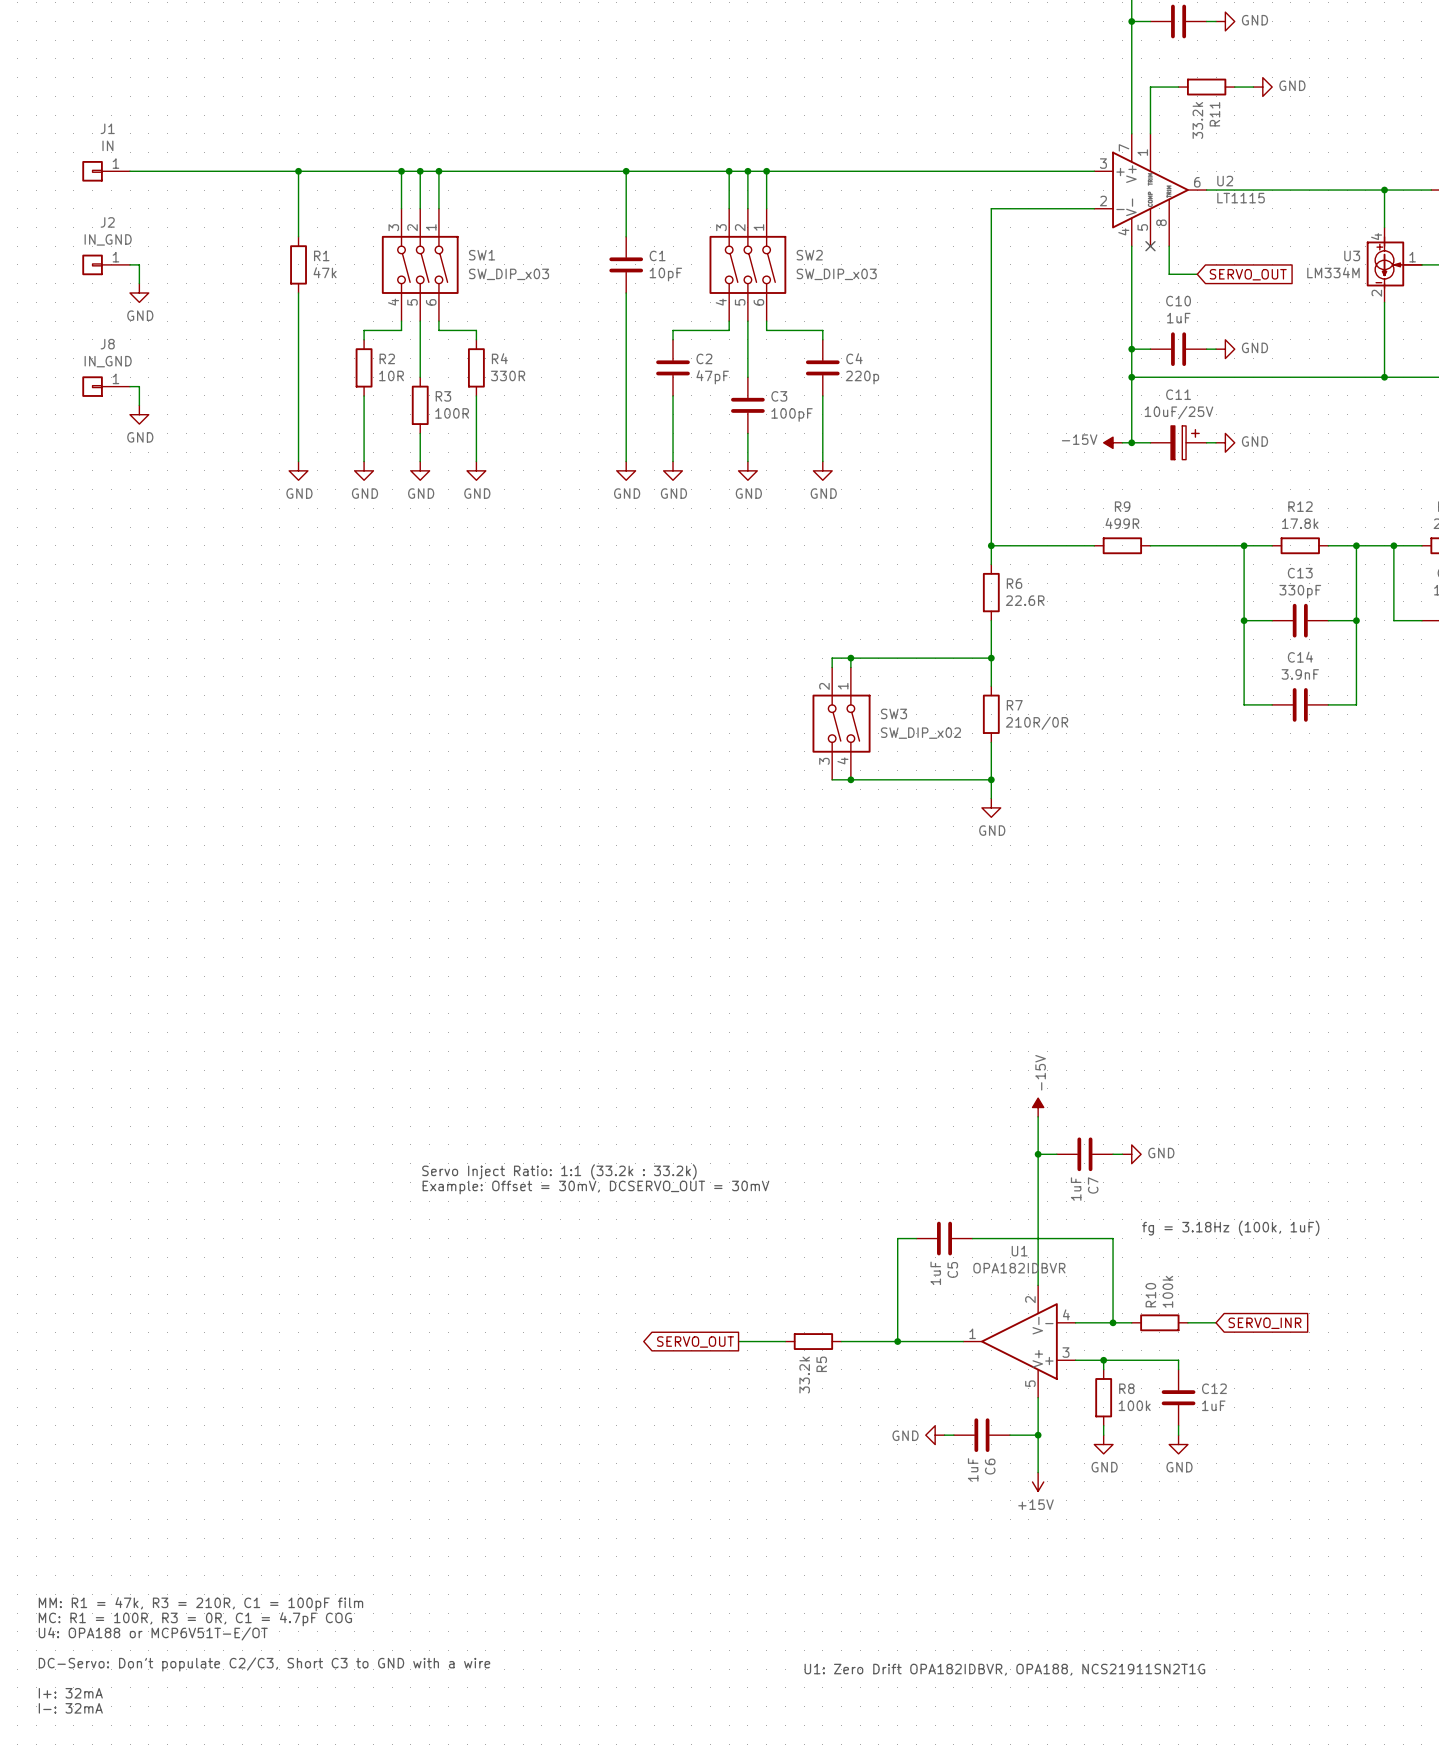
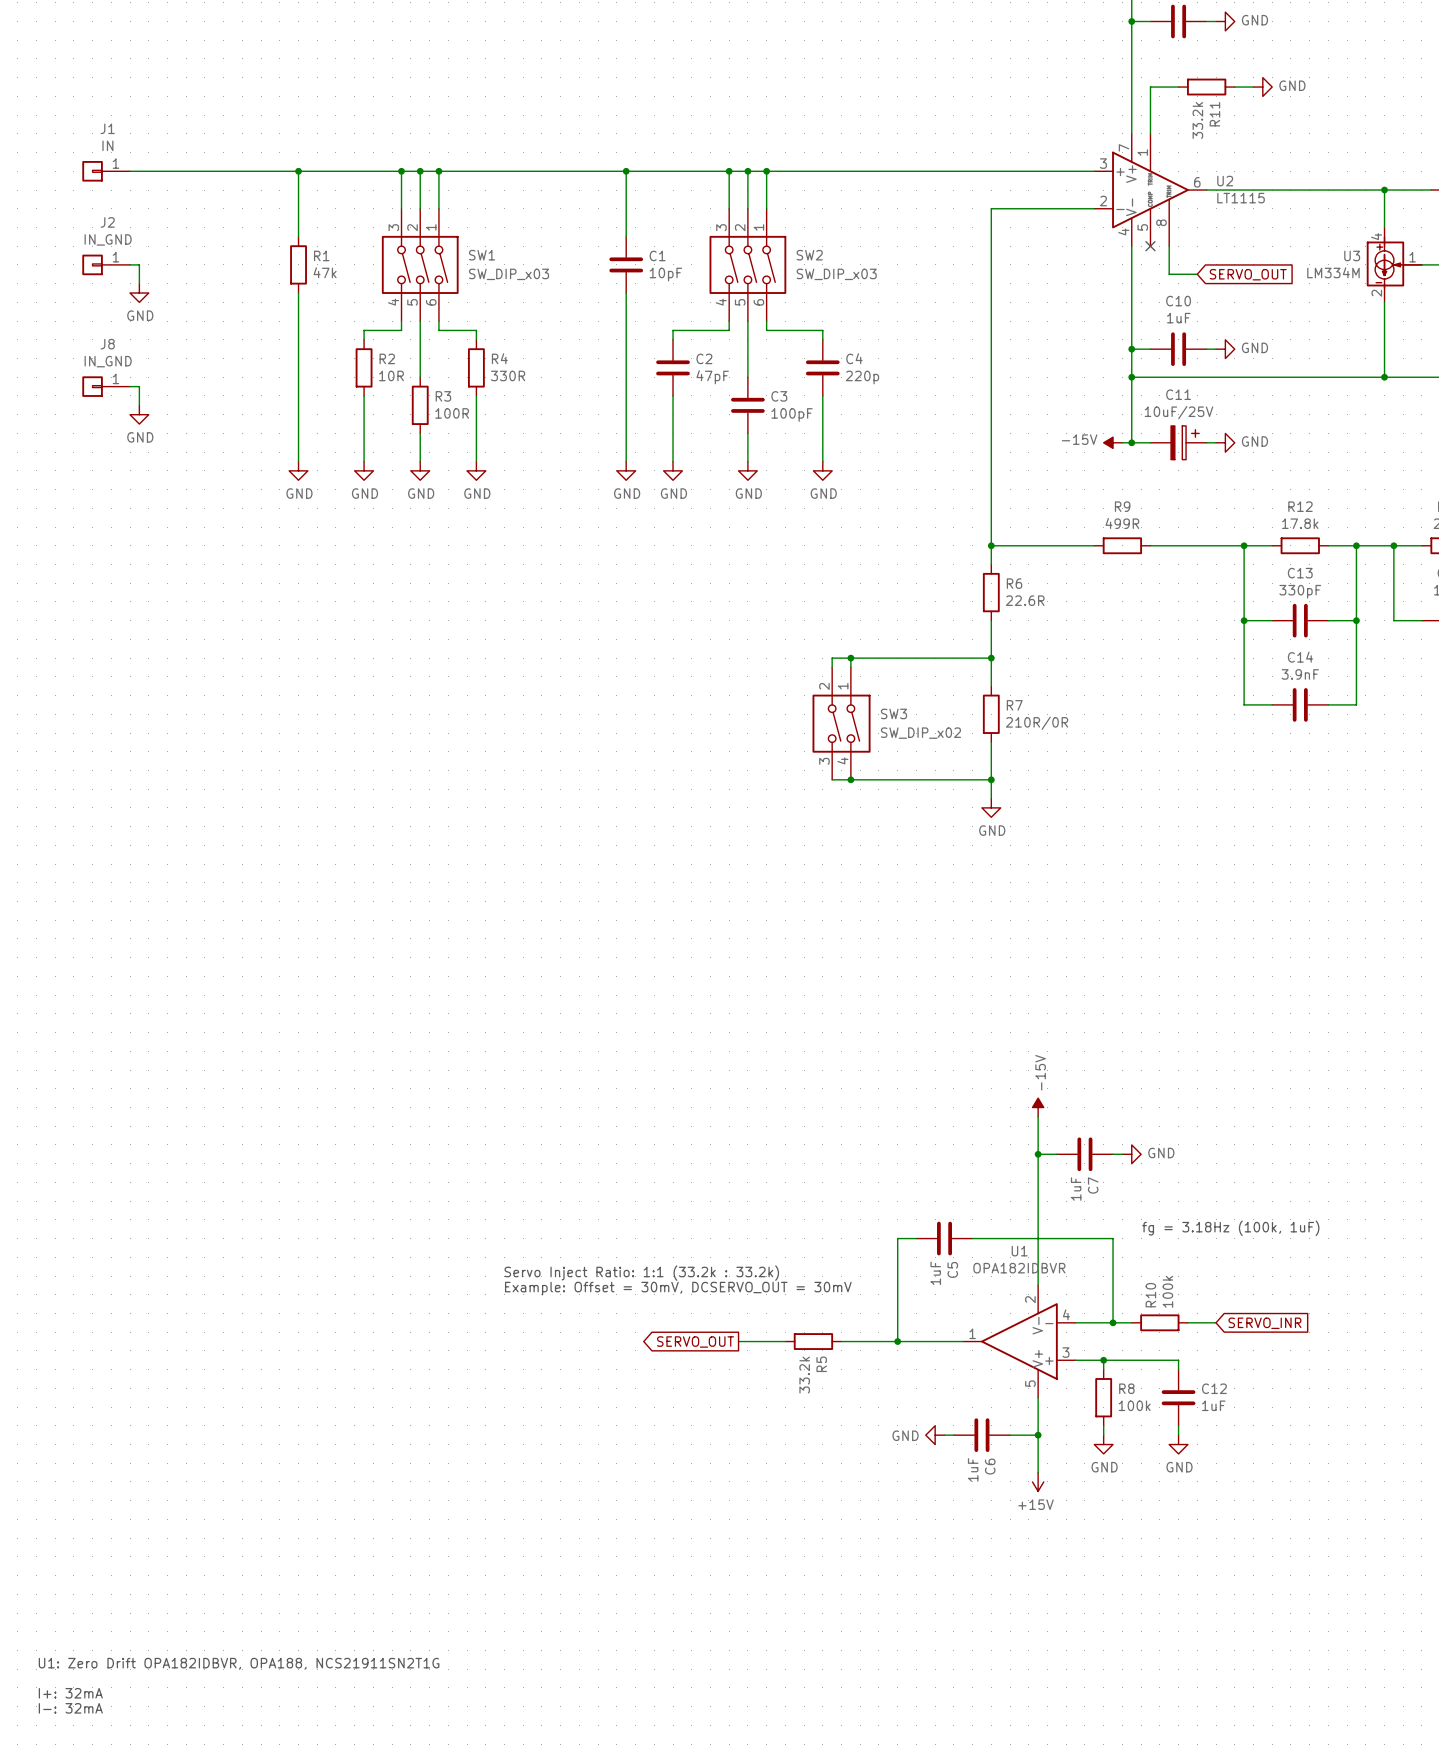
text position: Servo Inject Ratio: 1:1 (33.2k : 33.2k) (559, 1171) -> Servo Inject Ratio: 1:1 (33.2k : 33.2k) (641, 1273)
text position: Example: Offset = 30mV, DCSERVO_OUT = 30mV (595, 1187) -> Example: Offset = 30mV, DCSERVO_OUT = 30mV (678, 1288)
text: MM: R1 = 47k, R3 = 210R, C1 = 100pF film (200, 1604) -> none
text: MC: R1 = 100R, R3 = 0R, C1 = 4.7pF COG (195, 1619) -> none
text: U4: OPA188 or MCP6V51T-E/OT (153, 1633) -> none
text: DC-Servo: Don’t populate C2/C3, Short C3 to GND with a wire (264, 1664) -> U1: Zero Drift OPA182IDBVR, OPA188, NCS21911SN2T1G (239, 1663)
text: U1: Zero Drift OPA182IDBVR, OPA188, NCS21911SN2T1G (1004, 1669) -> none

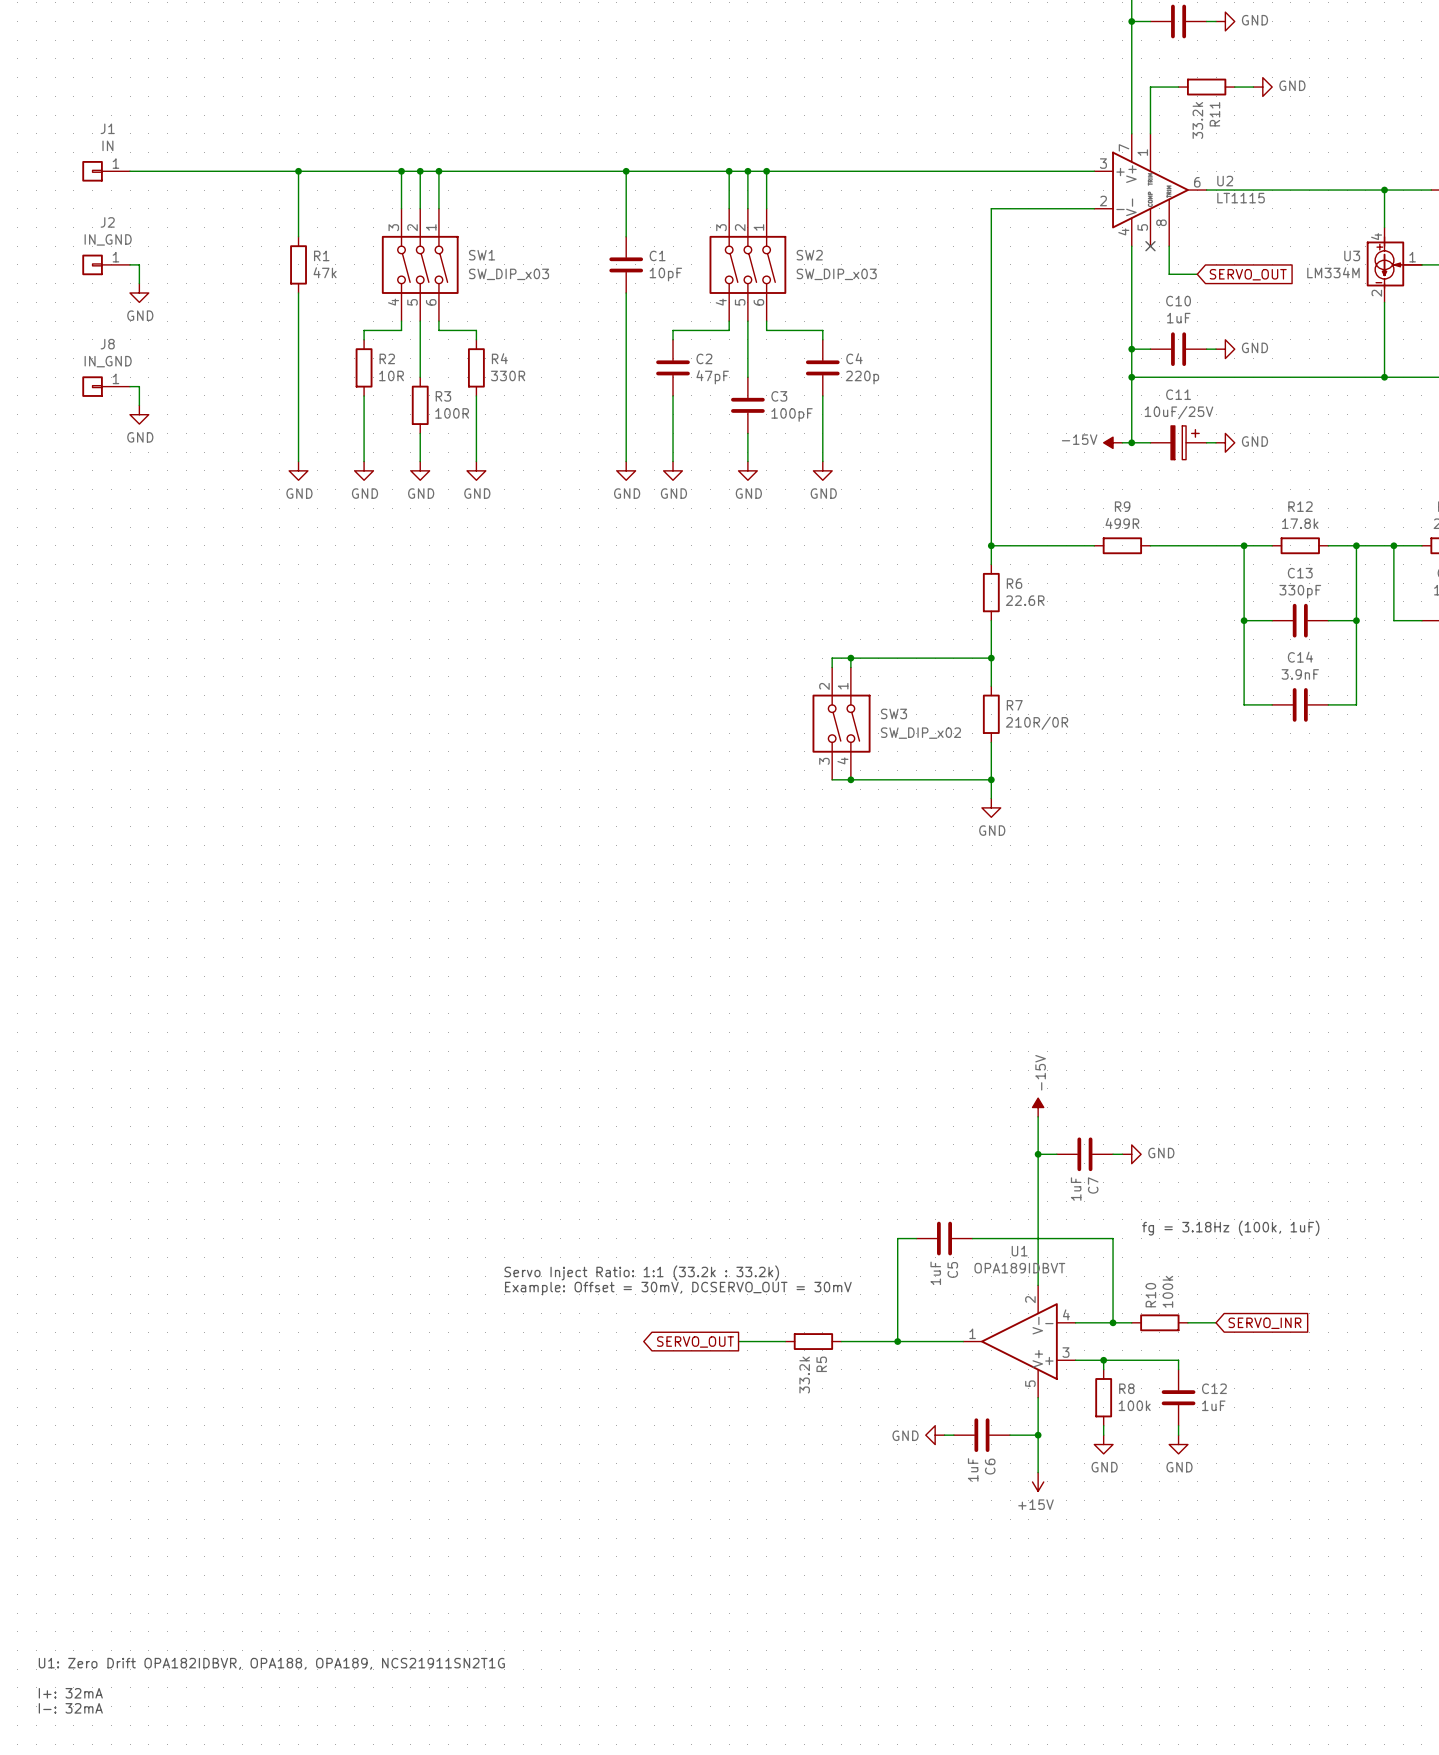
U1 value: OPA182IDBVR (1019, 1268) -> OPA189IDBVT (1019, 1268)
text: U1: Zero Drift OPA182IDBVR, OPA188, NCS21911SN2T1G (239, 1663) -> U1: Zero Drift OPA182IDBVR, OPA188, OPA189, NCS21911SN2T1G (271, 1663)

